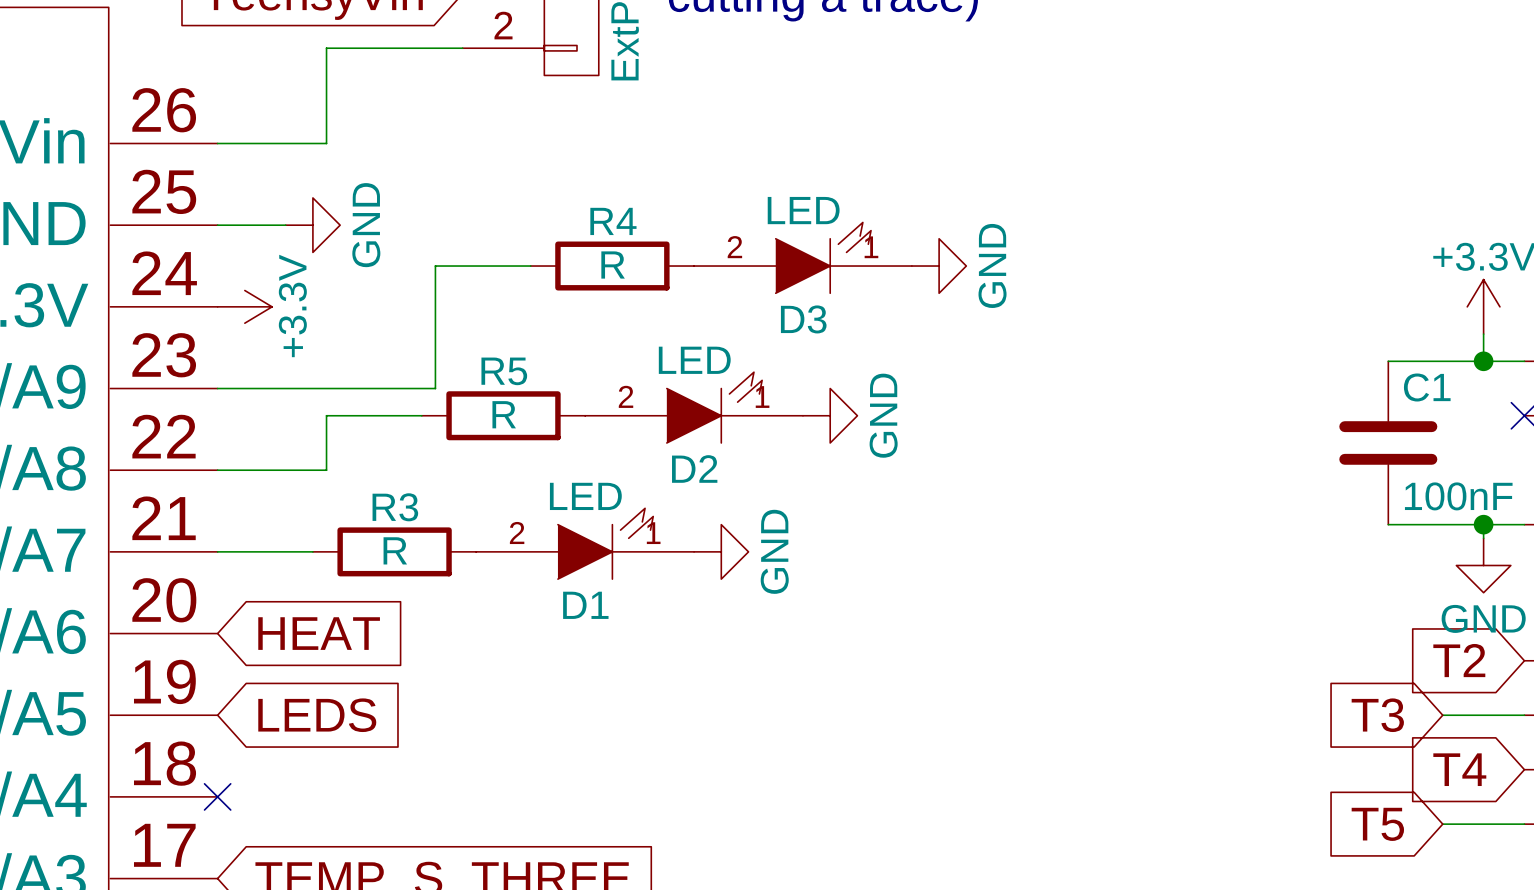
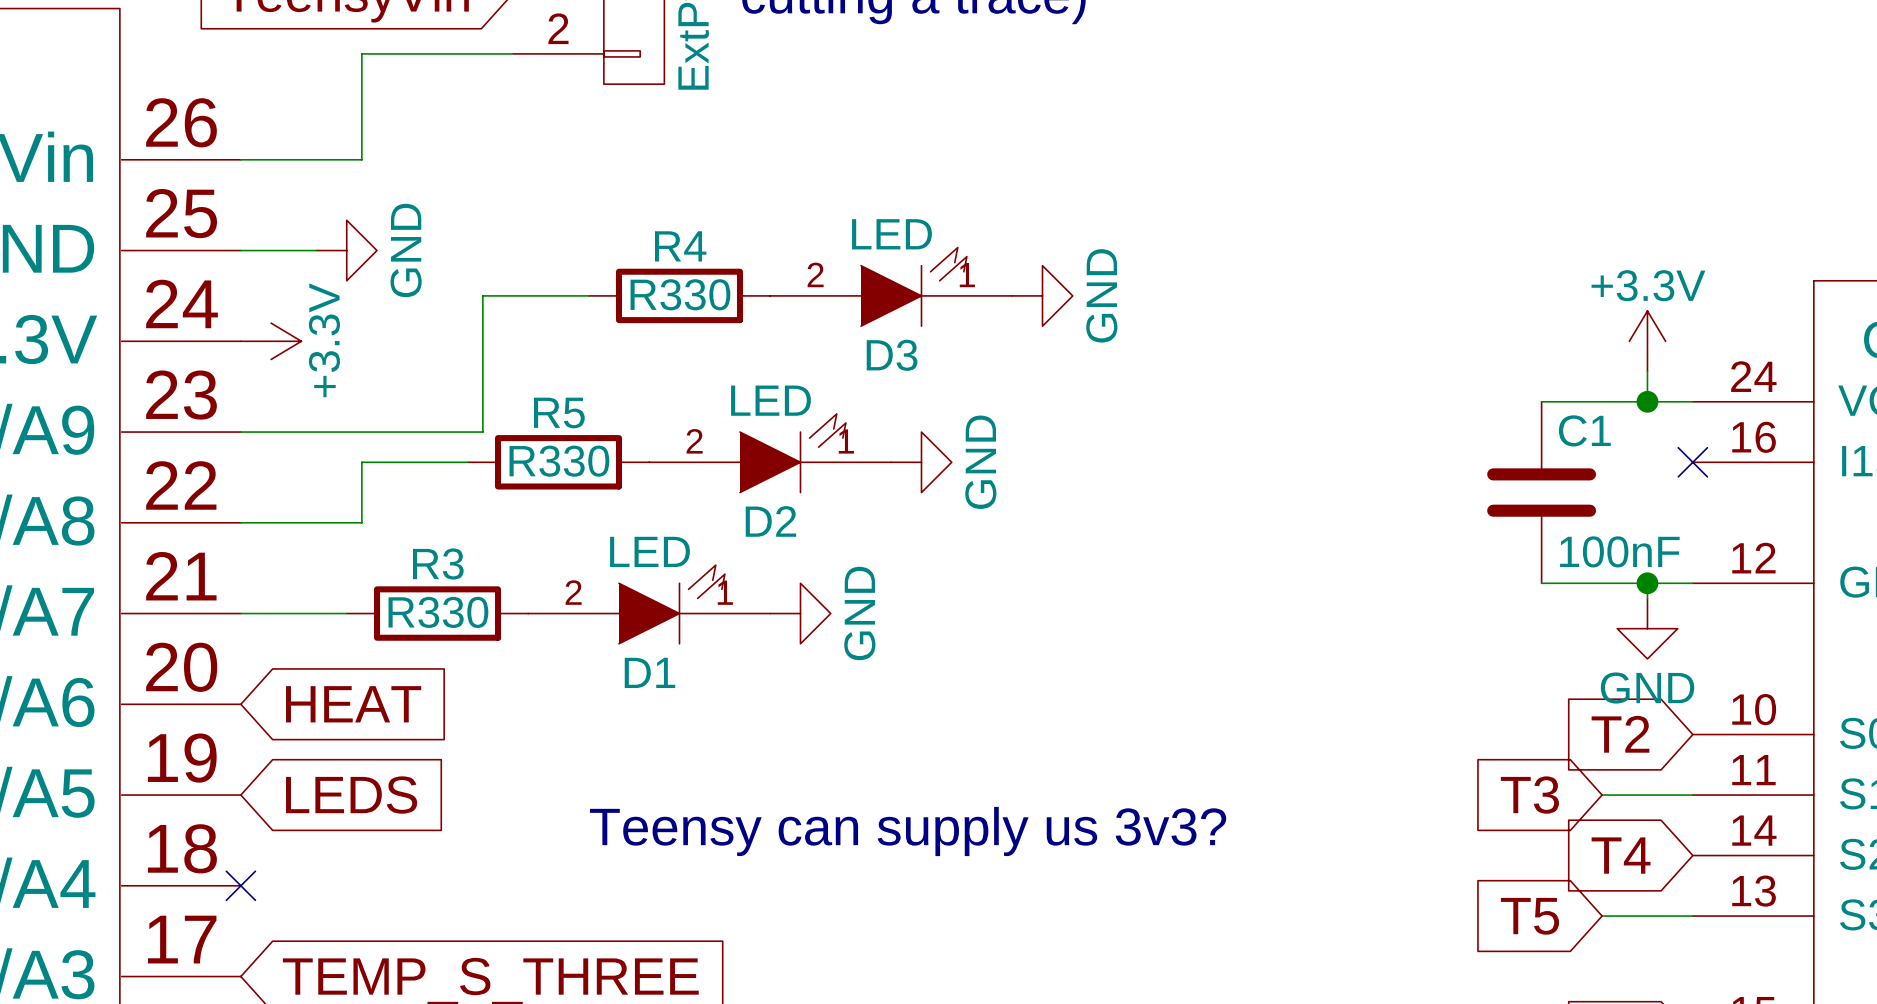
R4 value: R (613, 265) -> R330 (680, 294)
R5 value: R (504, 414) -> R330 (559, 461)
R3 value: R (395, 550) -> R330 (438, 612)
text: none -> Teensy can supply us 3v3? (908, 831)

